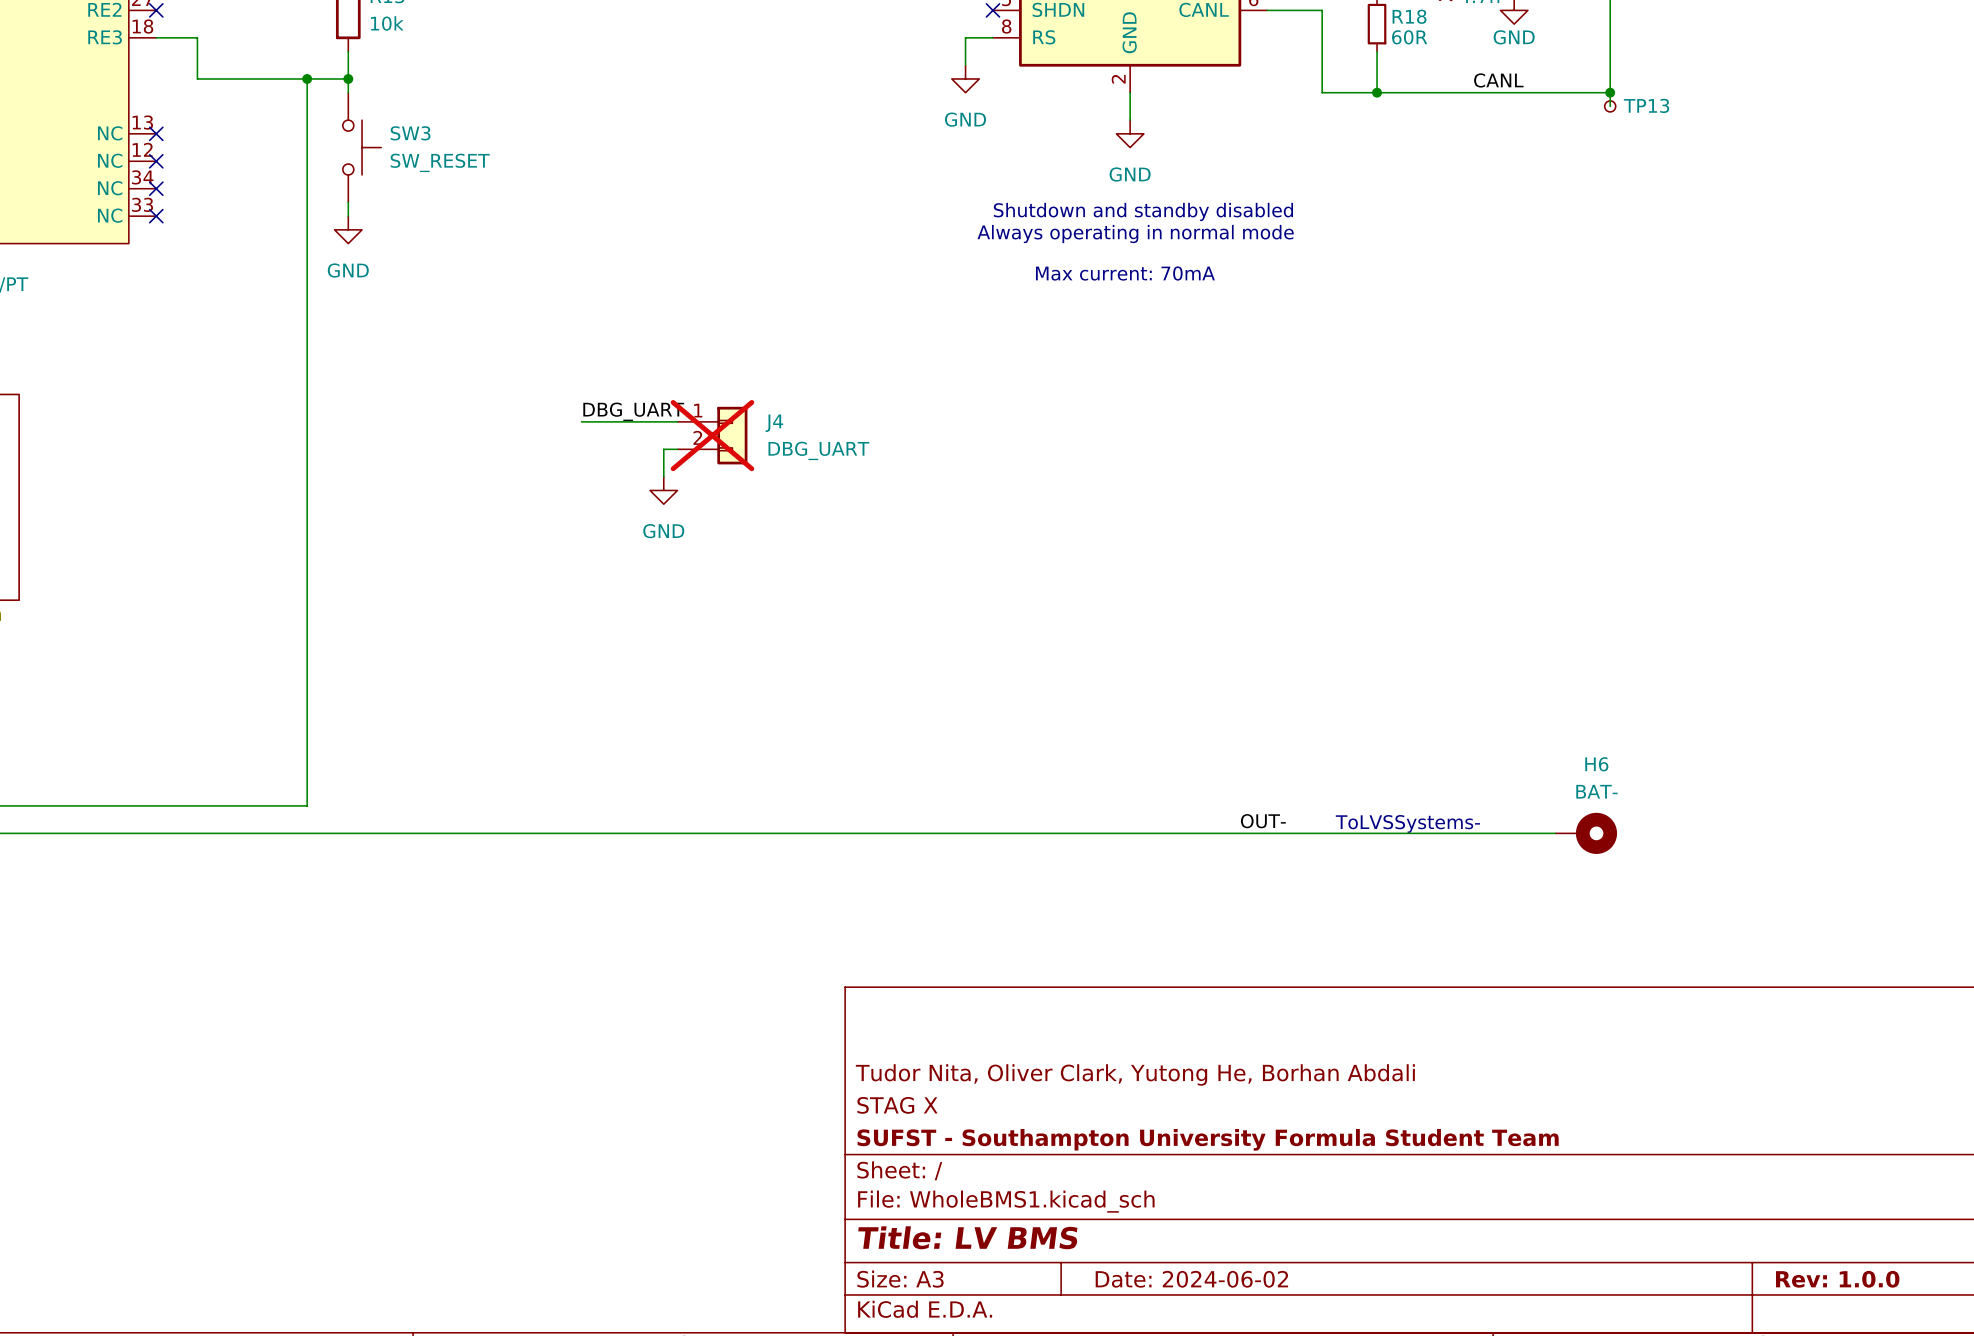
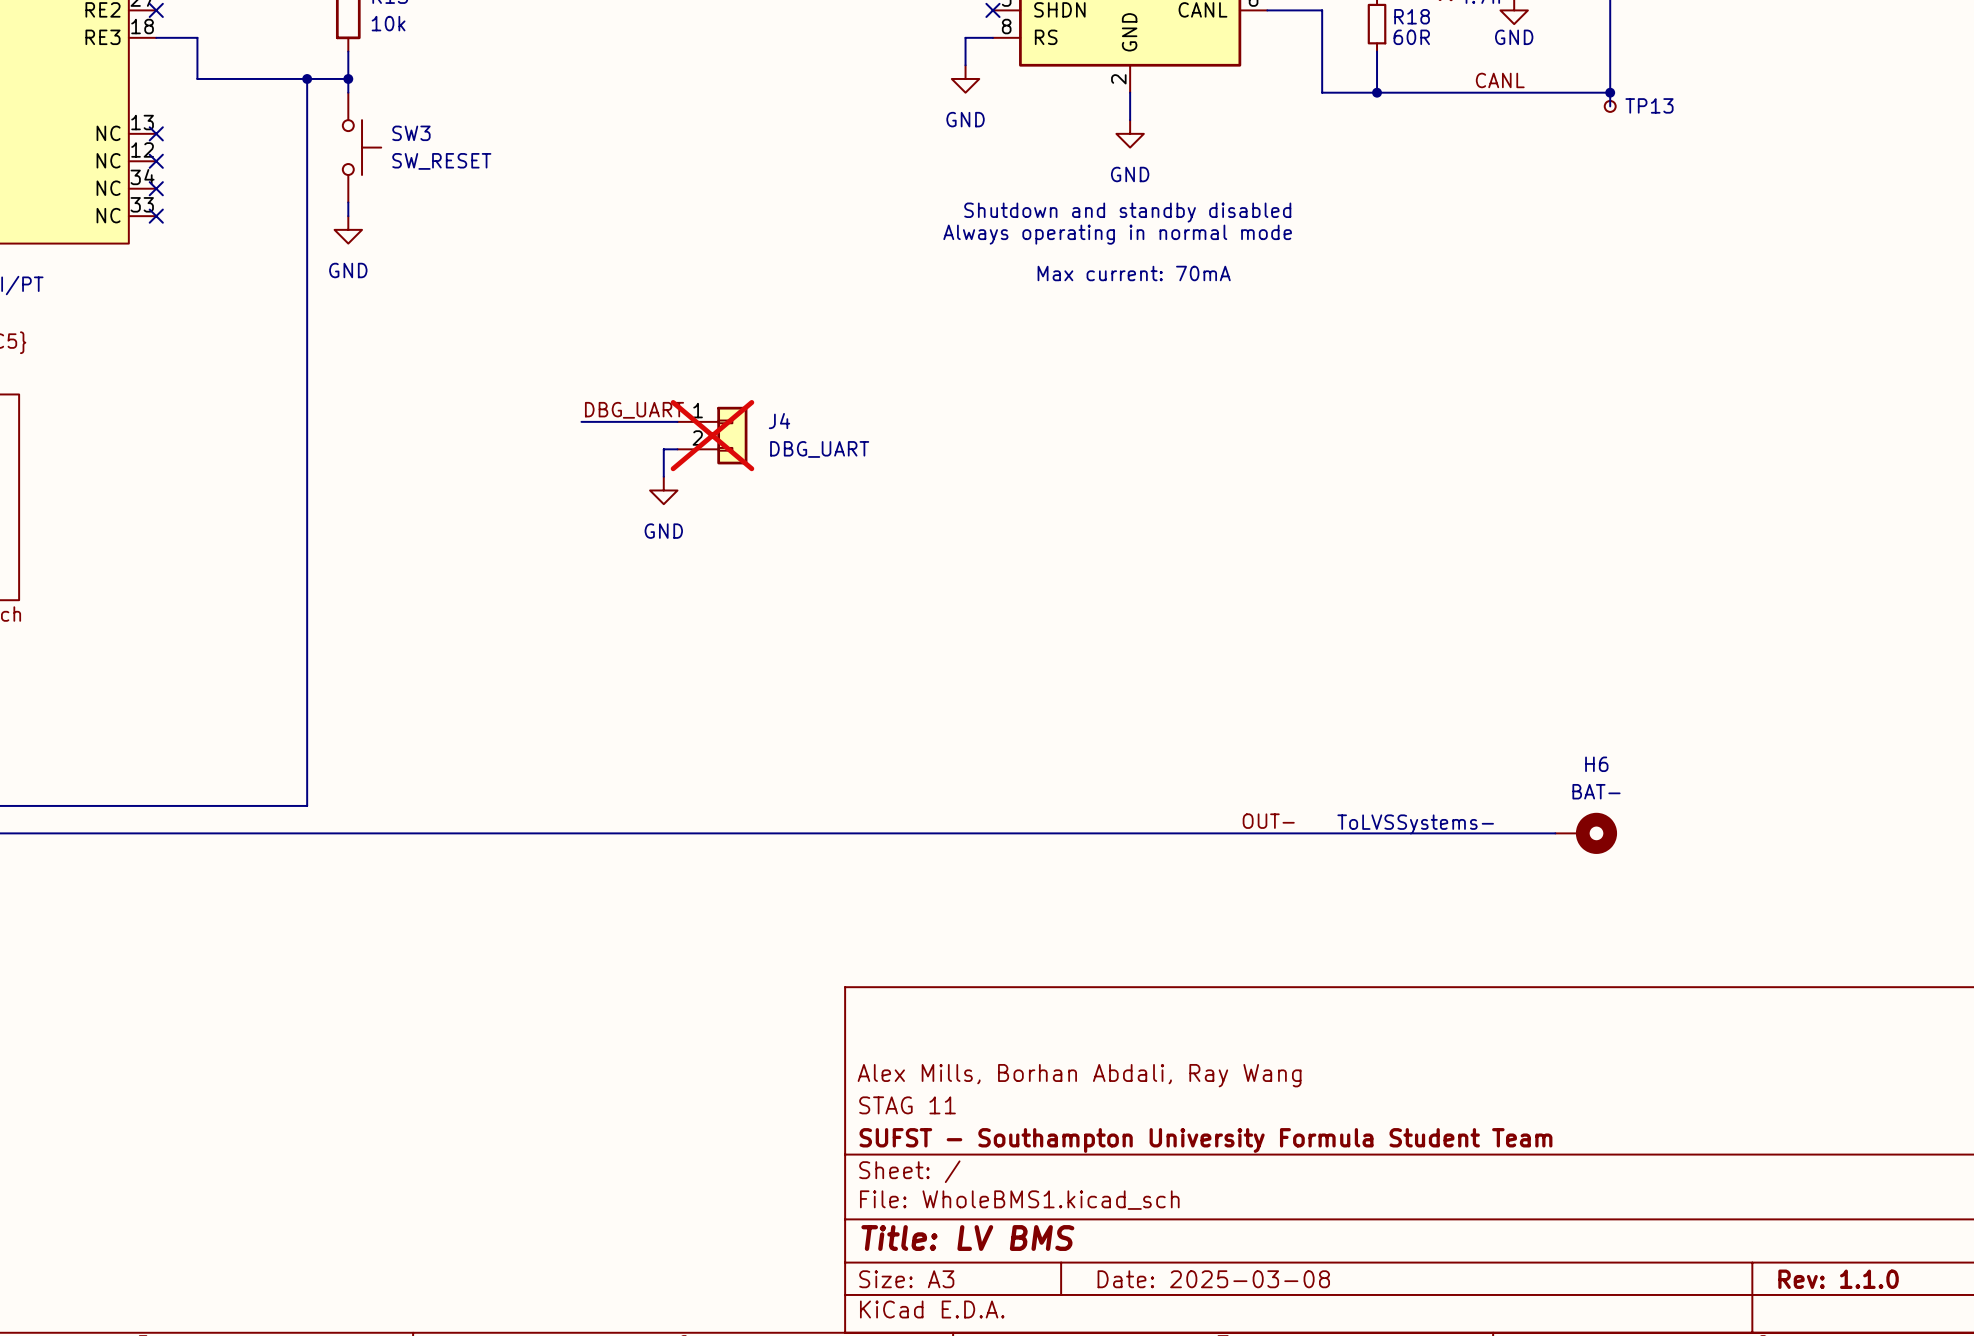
title block: Tudor Nita, Oliver Clark, Yutong He, Borhan Abdali (1135, 1074) -> Alex Mills, Borhan Abdali, Ray Wang (1079, 1075)
title block: STAG X (897, 1105) -> STAG 11 (907, 1105)
title block: Date: 2024-06-02 (1191, 1279) -> Date: 2025-03-08 (1213, 1279)
title block: Rev: 1.0.0 (1837, 1279) -> Rev: 1.1.0 (1838, 1279)

